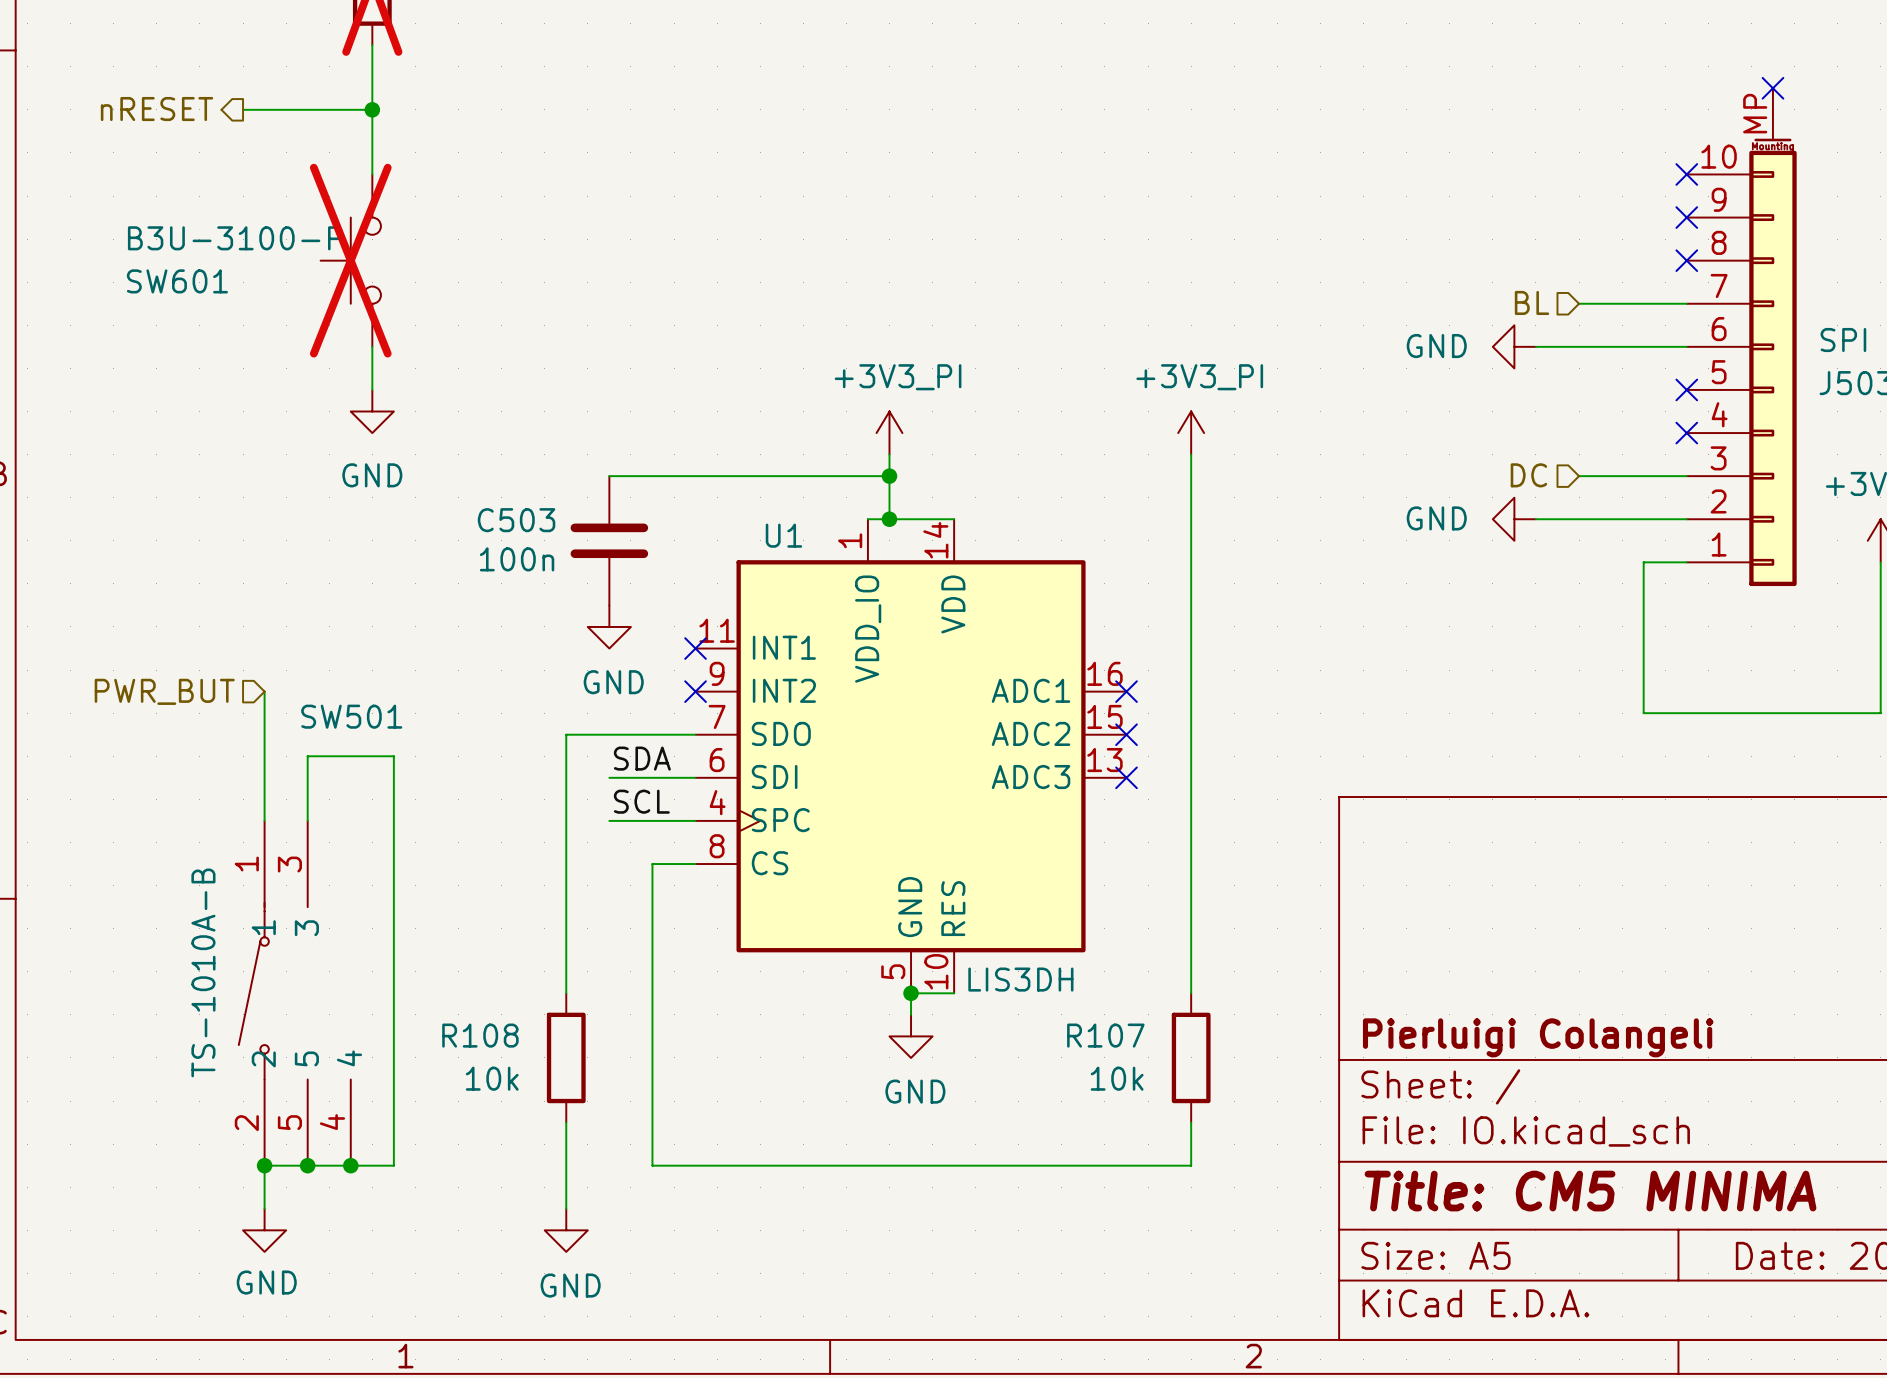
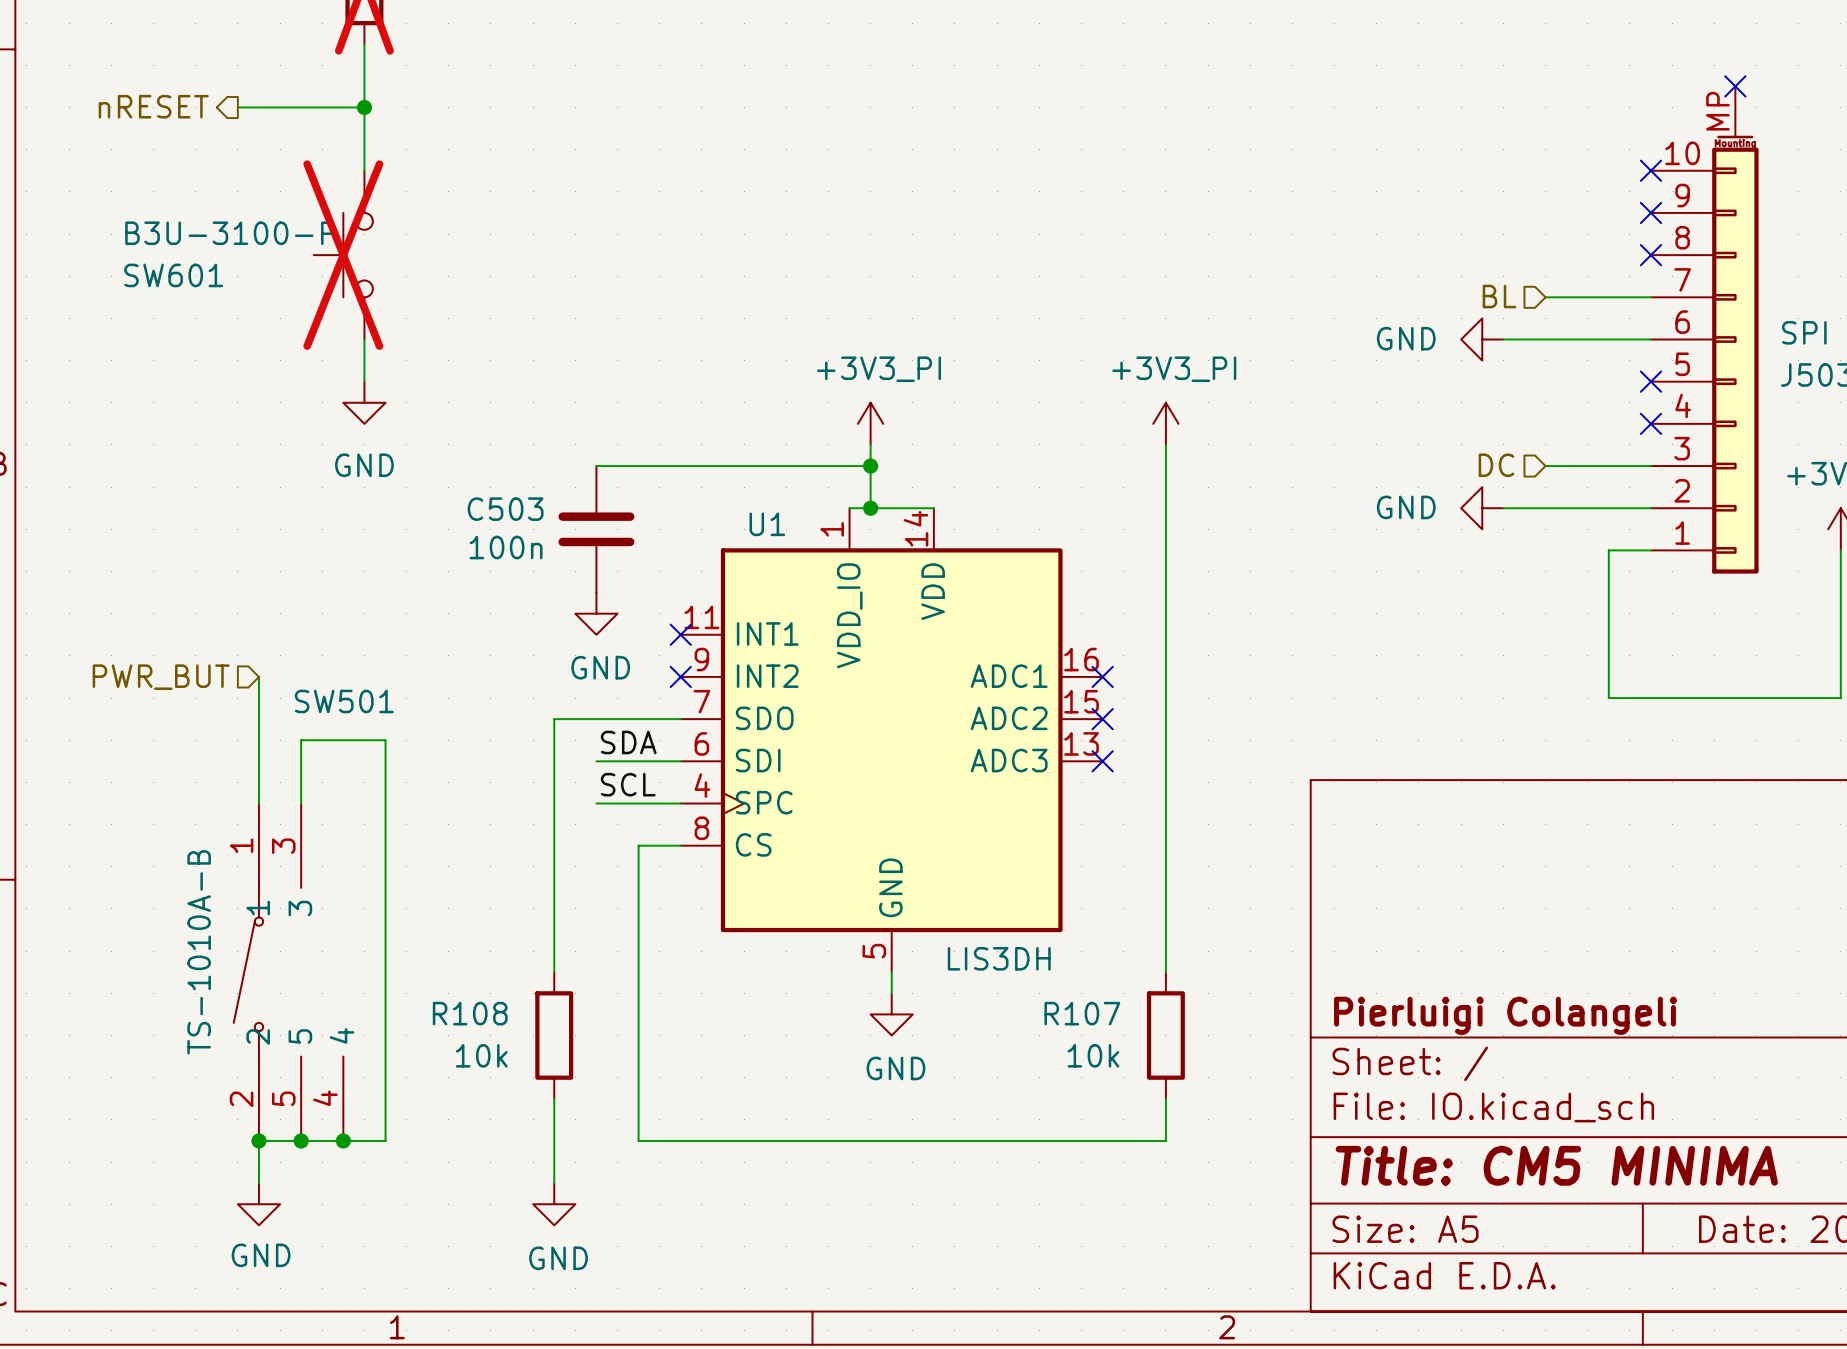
U1 symbol: [695, 519, 1127, 994] -> [680, 508, 1103, 973]
wire: (911, 993) (954, 993) -> none
junction: (911, 993) -> none

